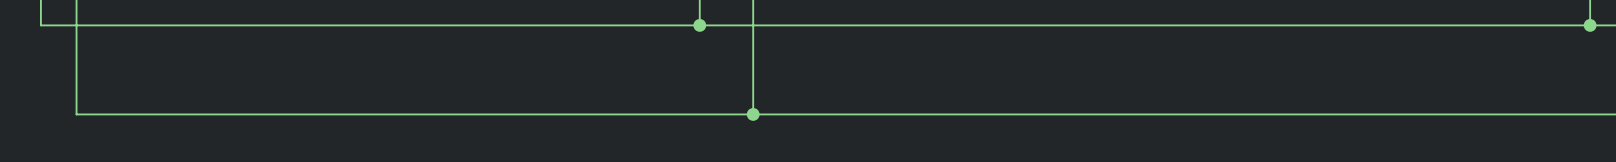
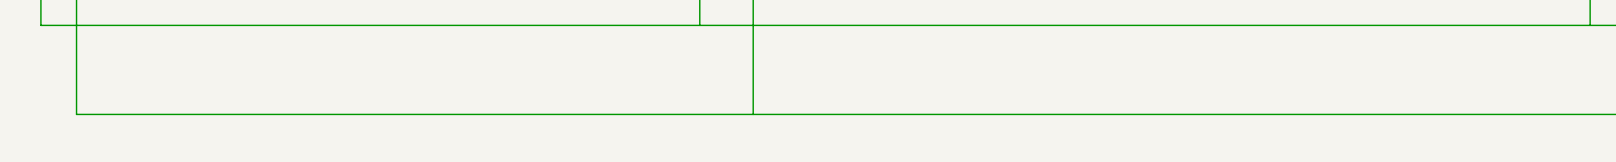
junction: (699, 25) -> none
junction: (1590, 25) -> none
junction: (753, 114) -> none

